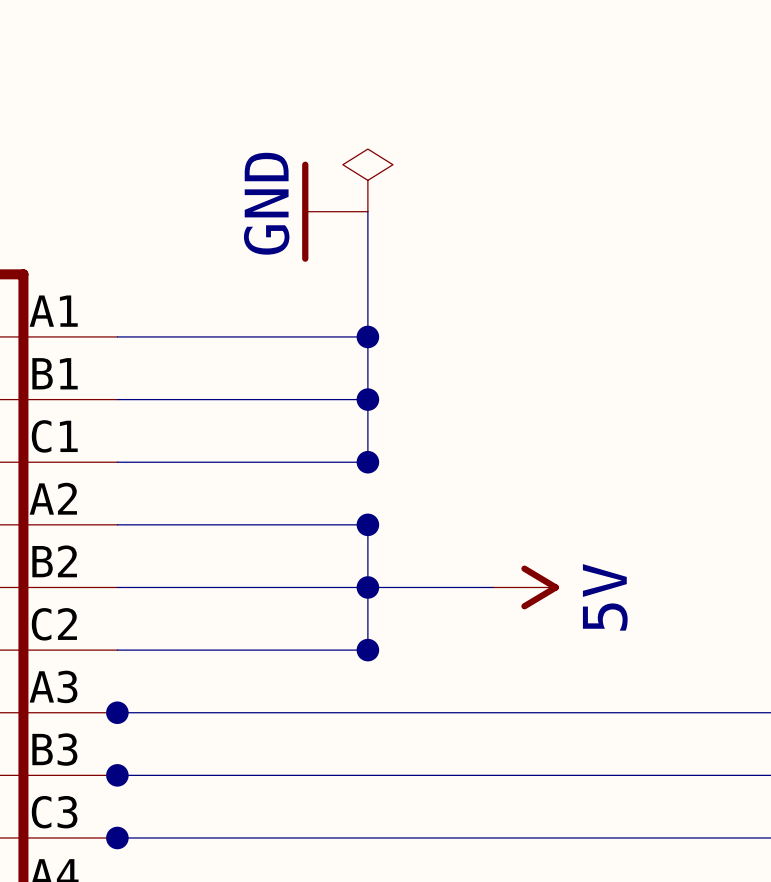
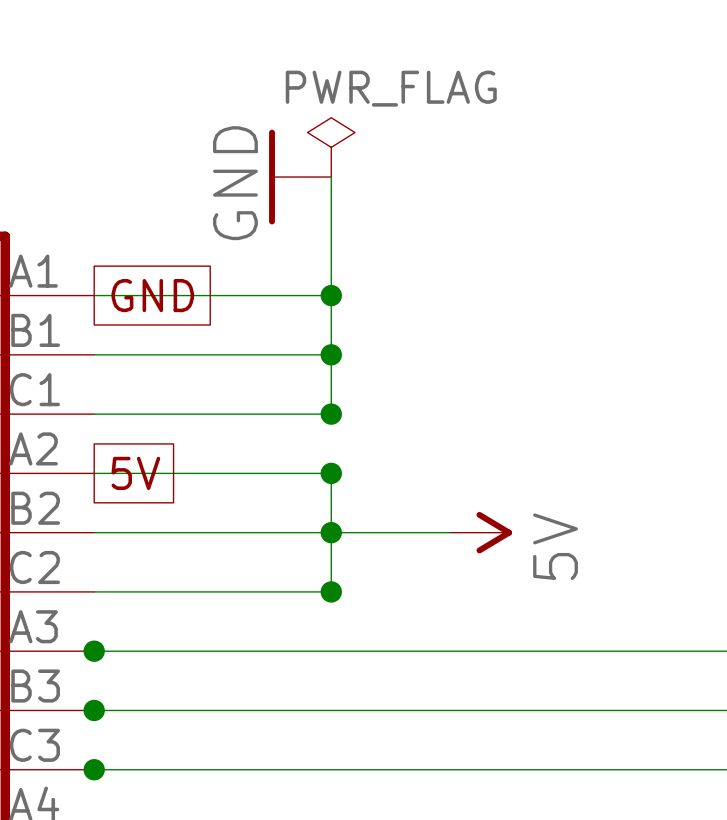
power symbol text: none -> PWR_FLAG (391, 88)
global label: none -> GND (152, 295)
global label: none -> 5V (135, 473)

